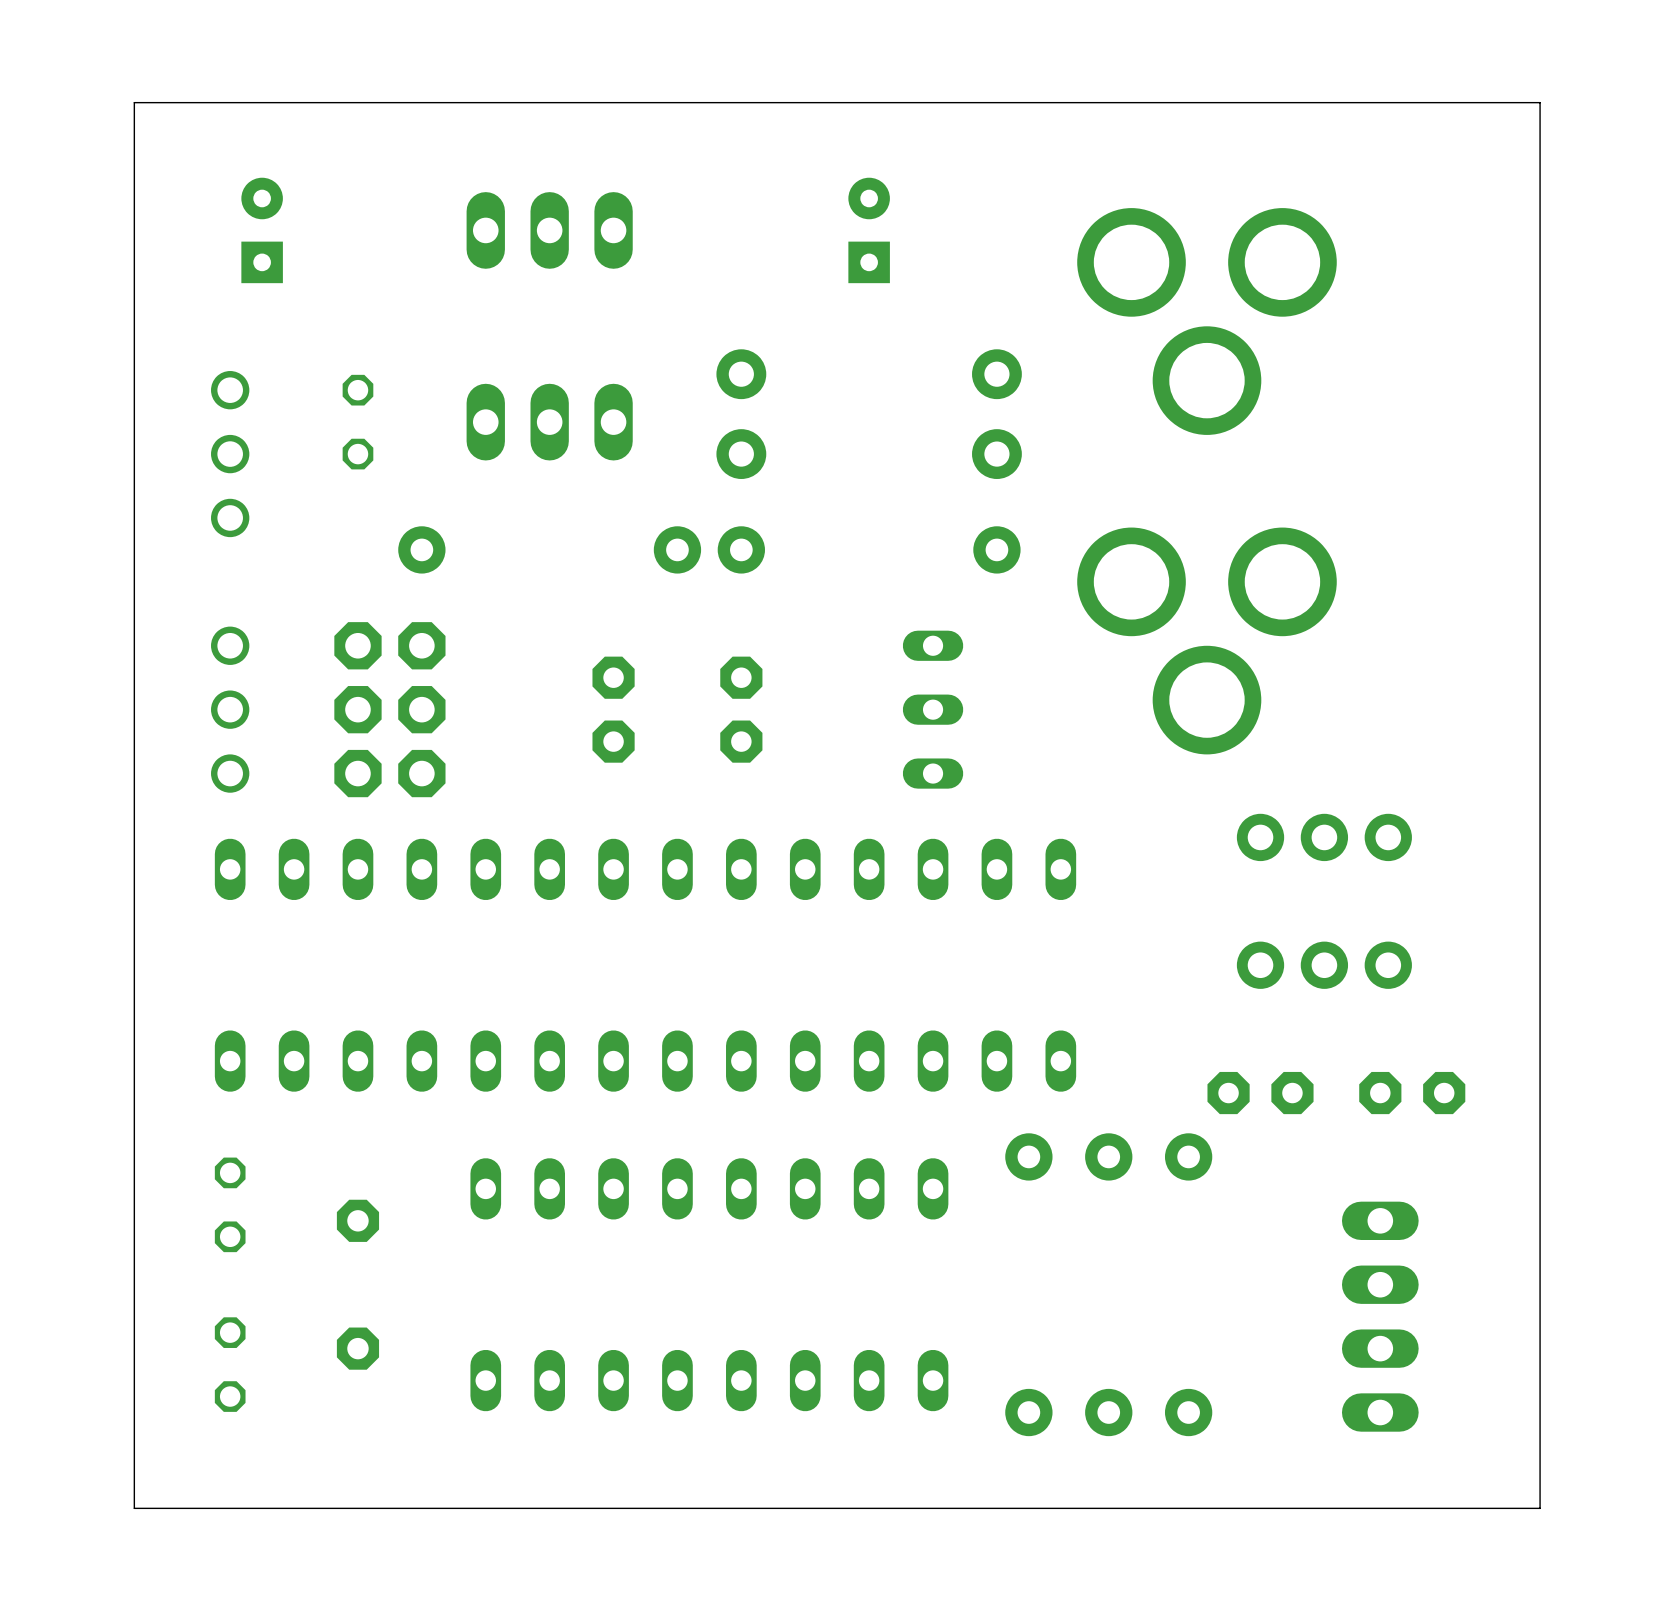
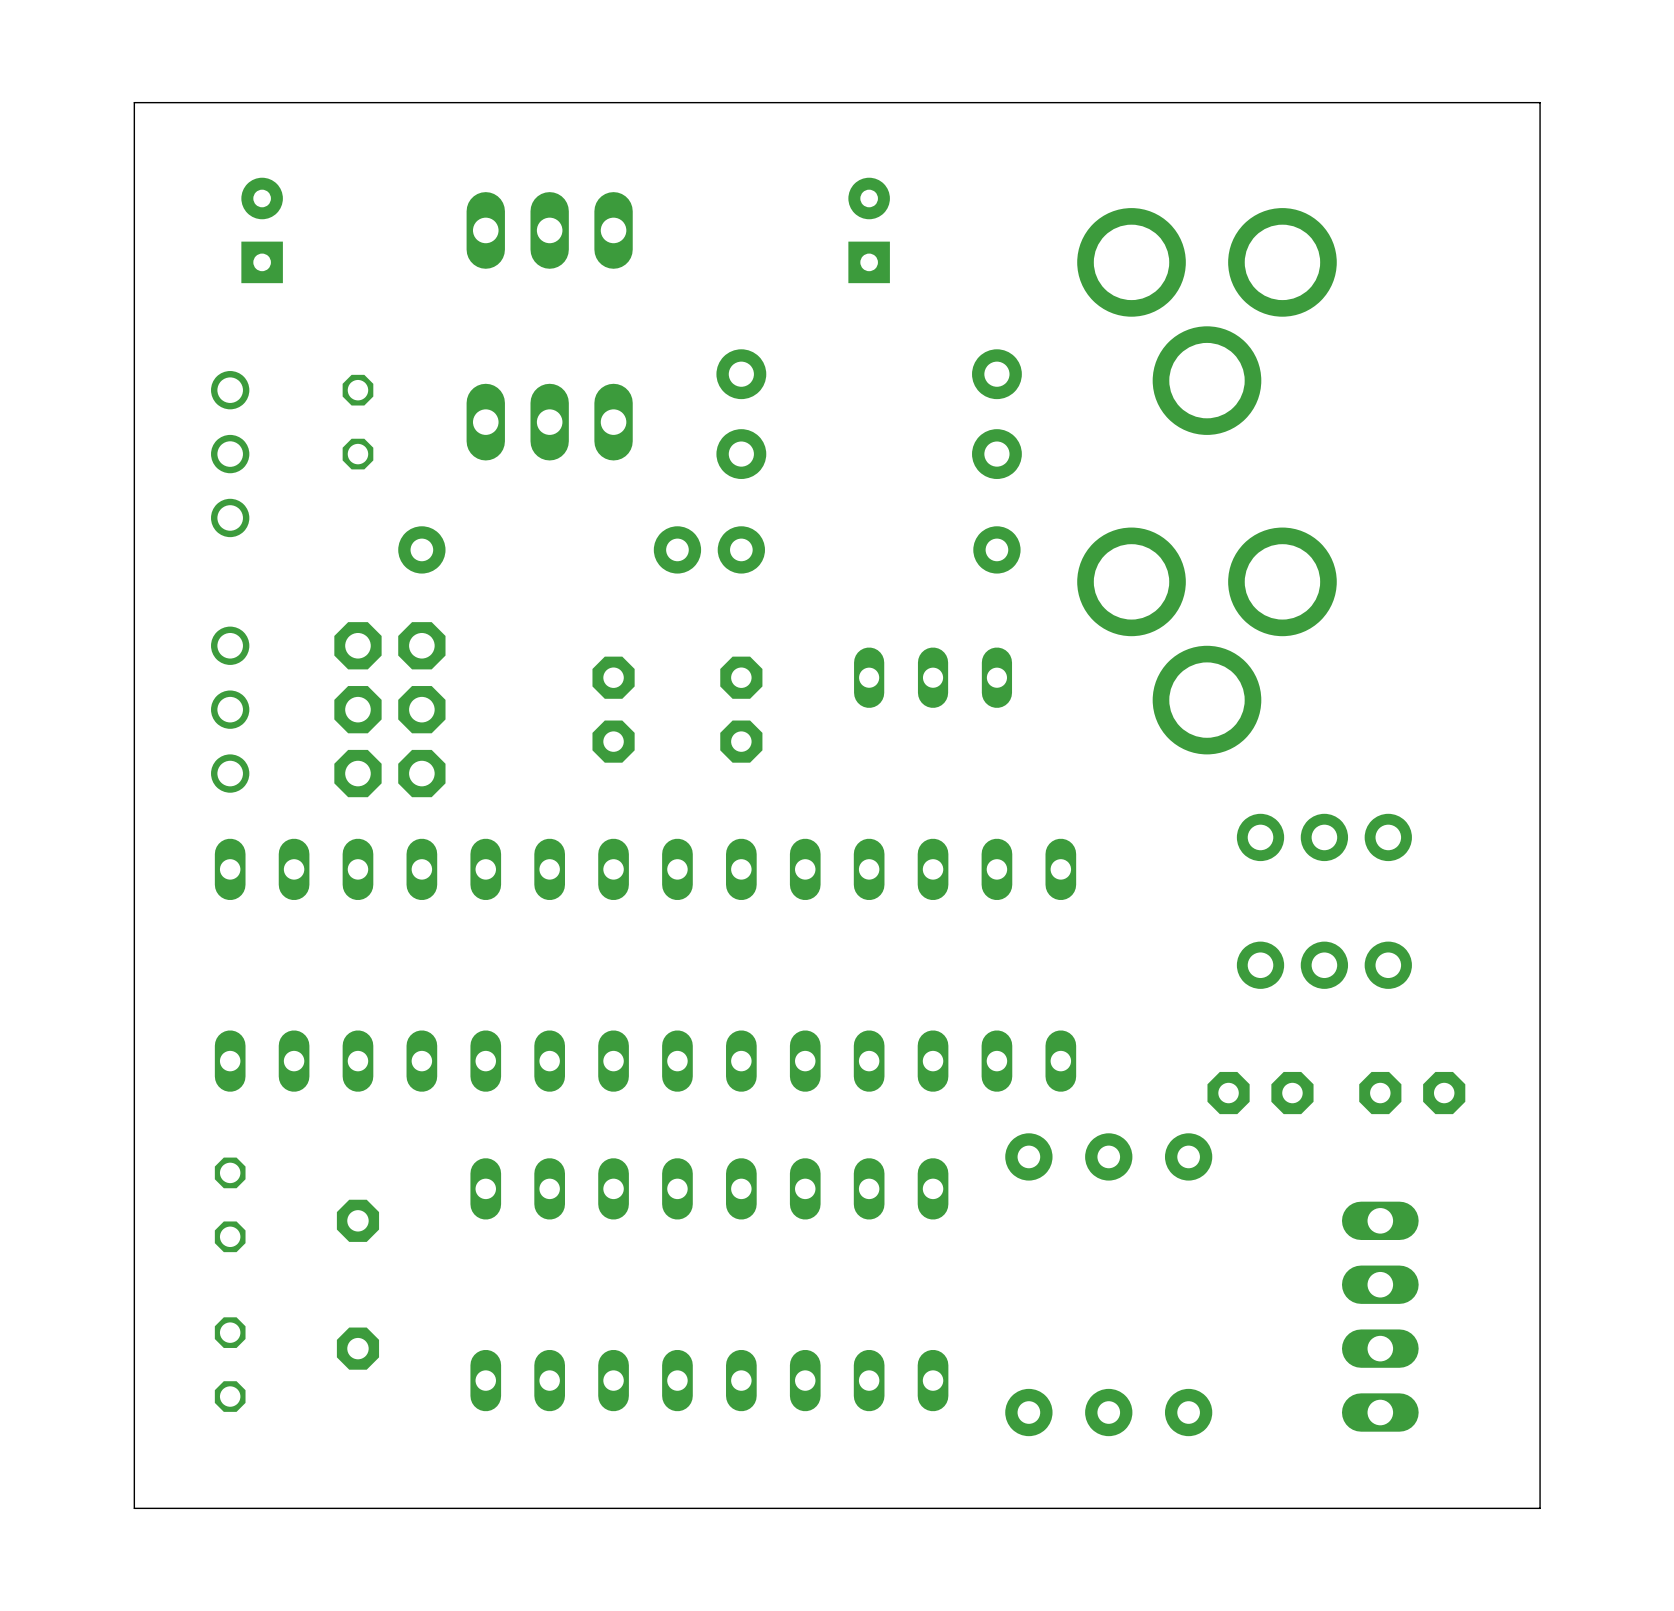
part rotation: 0° (933, 709) -> 90° clockwise (933, 677)

